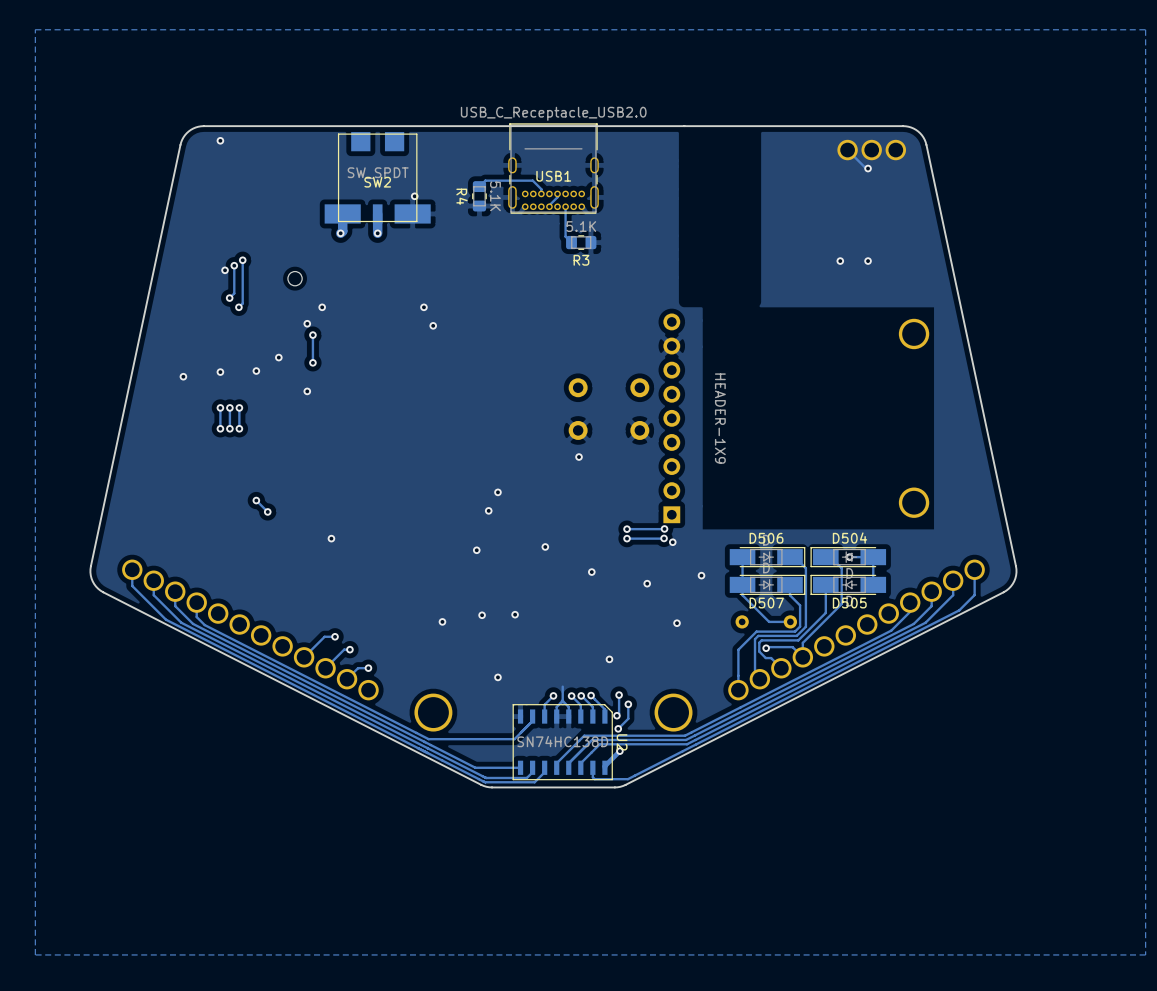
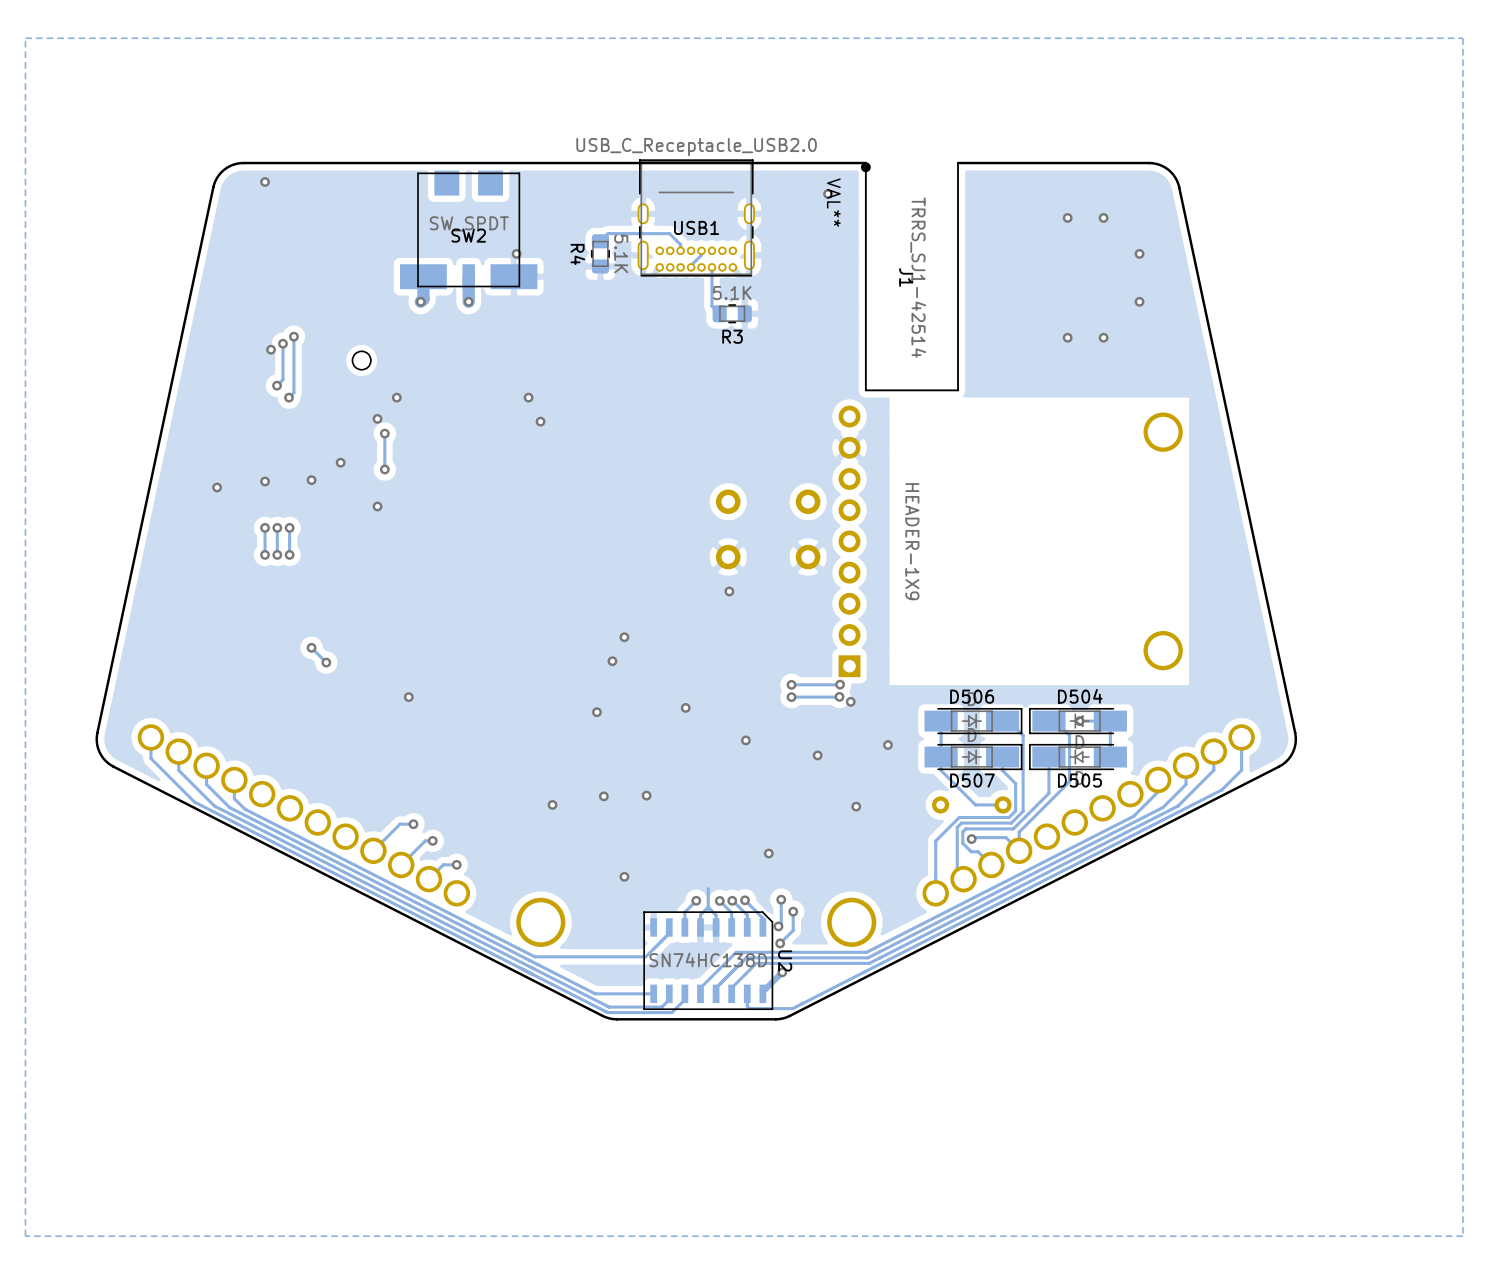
board edge: (903, 126) (684, 126) -> (1149, 163) (958, 163) (958, 390) (865, 390) (865, 163)
J1: none -> TRRS_SJ1-42514 (865, 167)
via: none -> (828, 193)
track: (847, 150) (868, 168) -> none
part: (847, 150) -> none
part: (871, 150) -> none
part: (895, 150) -> none
via: none -> (1067, 217)
via: none -> (1139, 253)
via: none -> (1139, 301)

